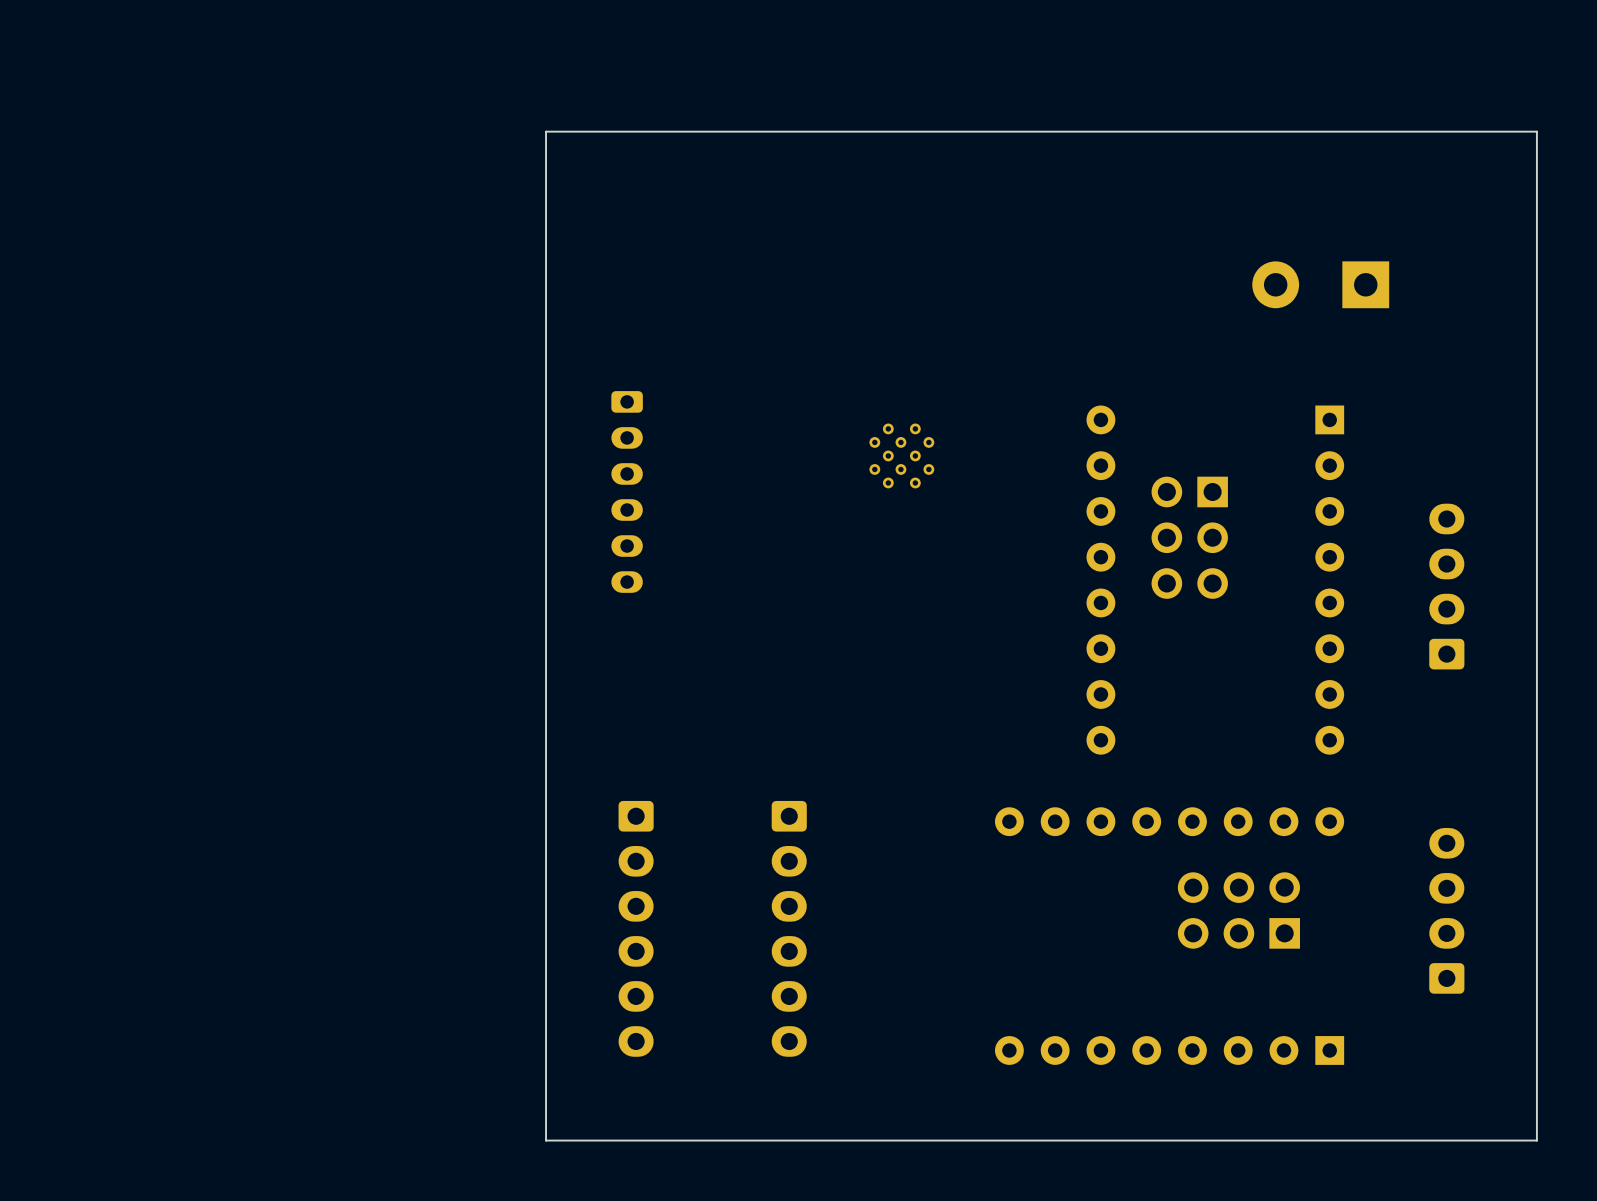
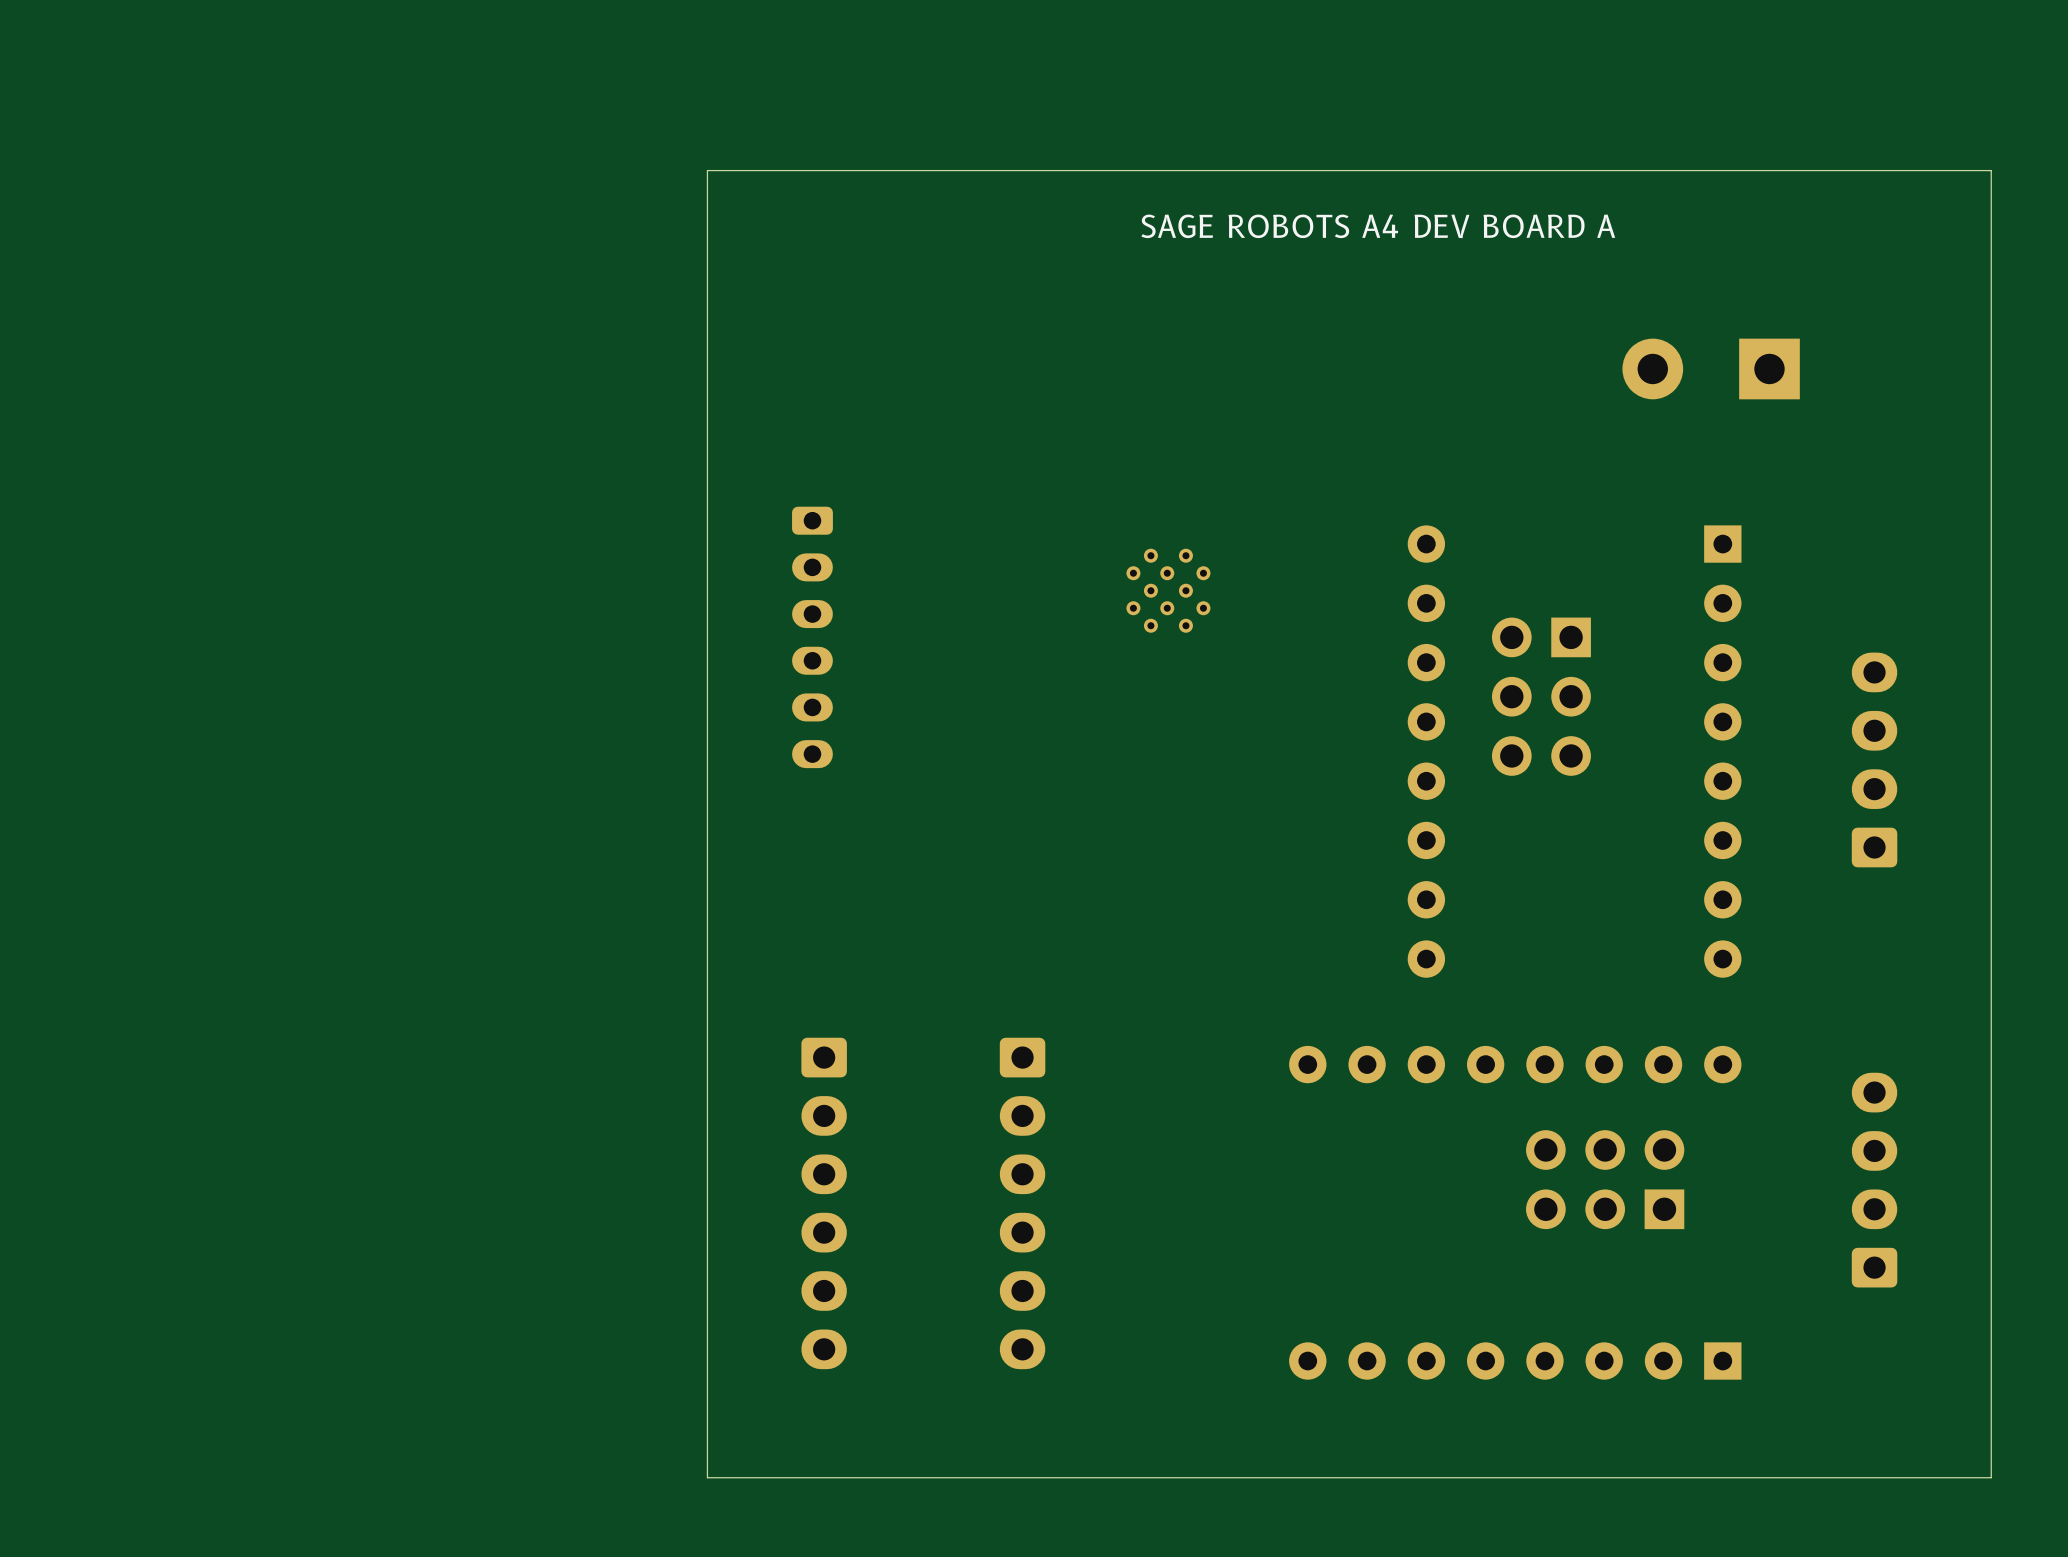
text: none -> SAGE ROBOTS A4 DEV BOARD A (1378, 226)

